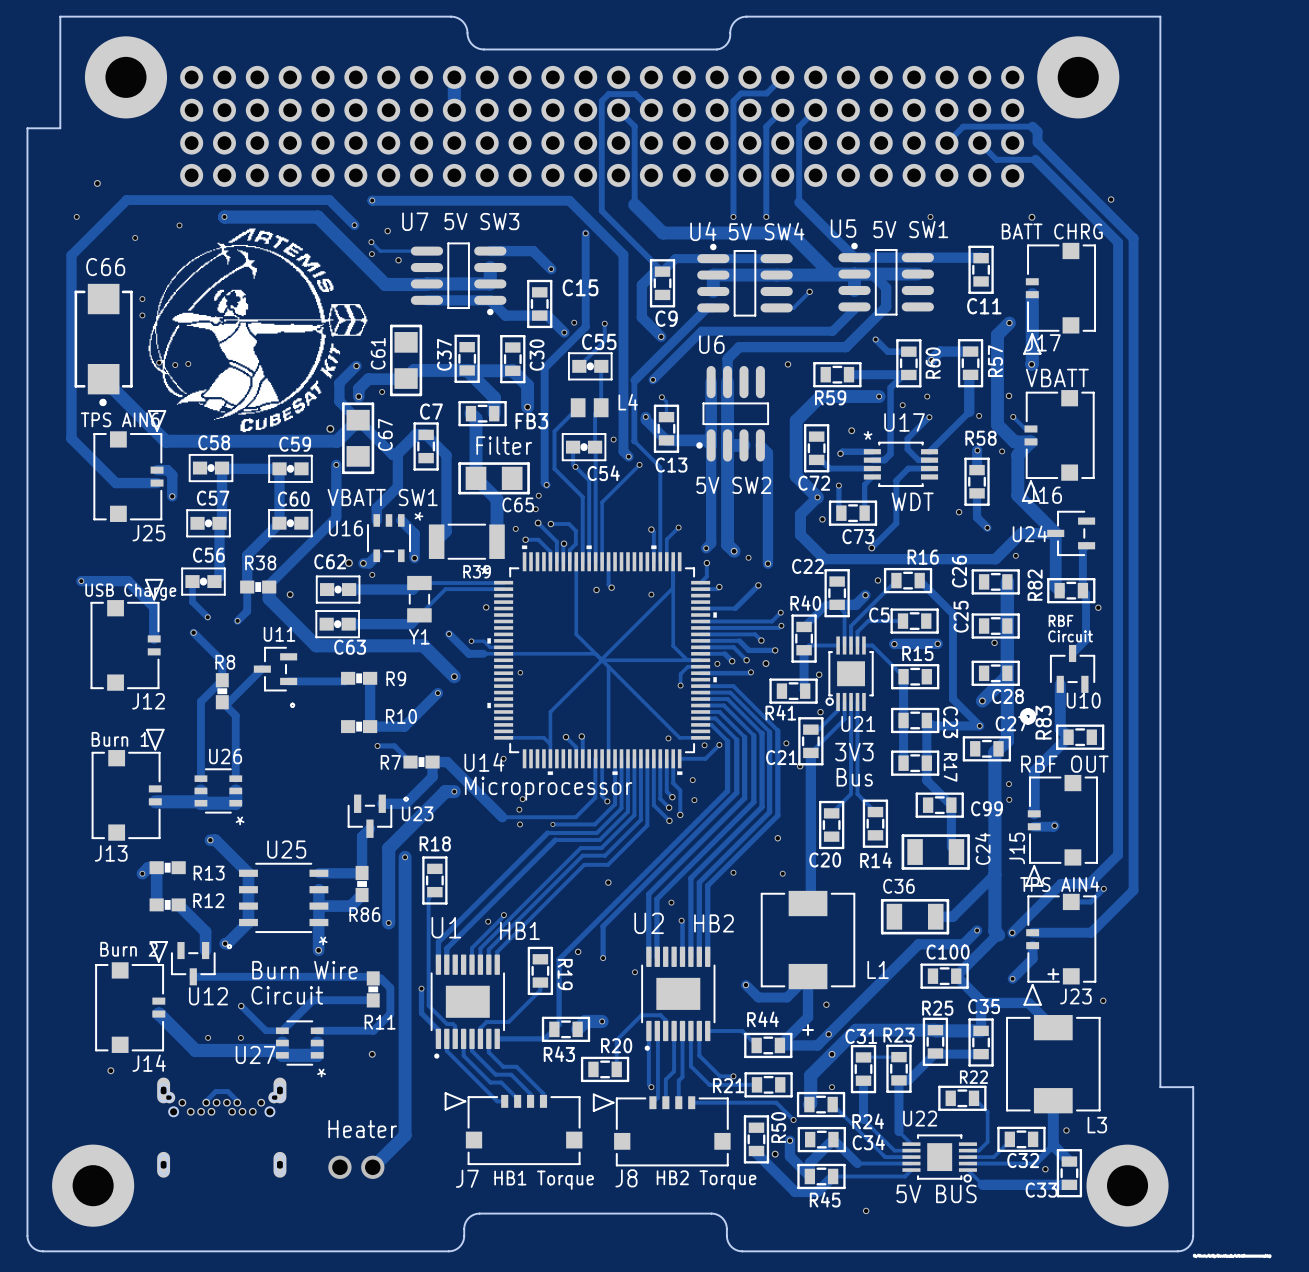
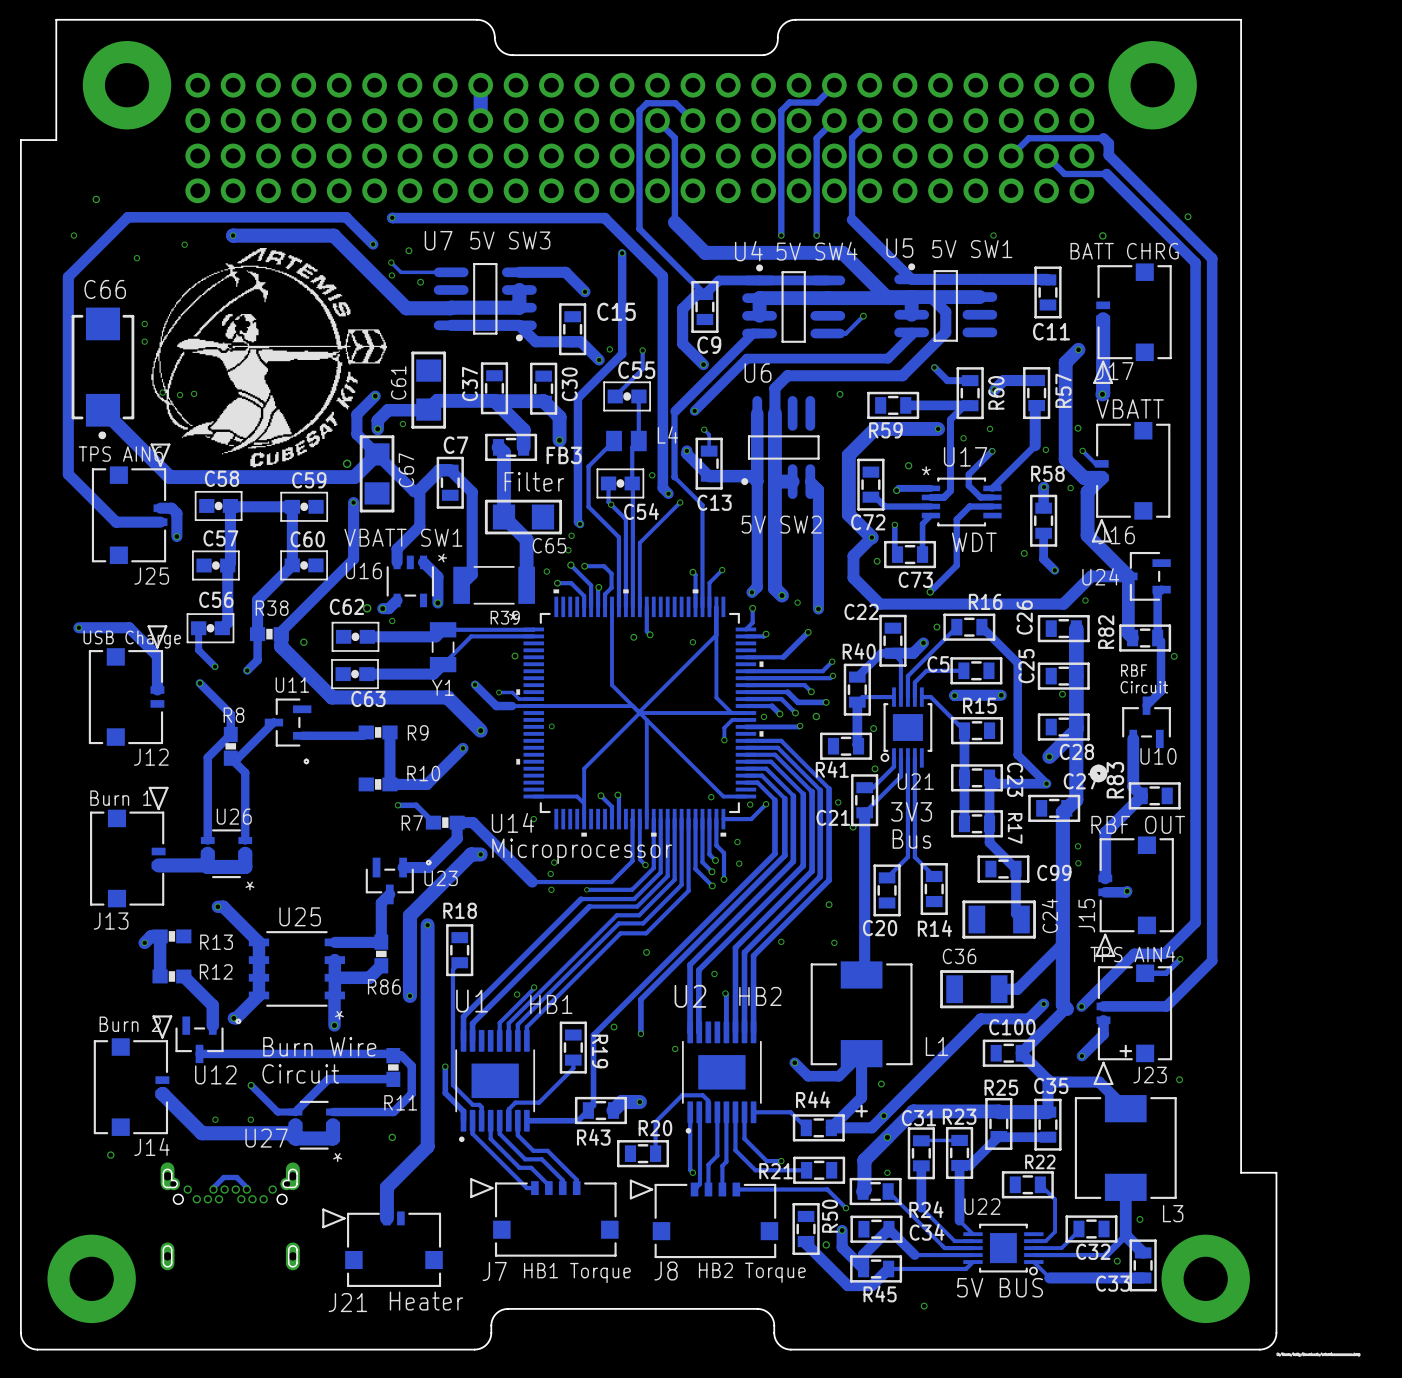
track: (405, 1062) (405, 1135) (372, 1167) -> (427, 1146) (386, 1187) (386, 1218)
text position: Heater (362, 1129) -> Heater (426, 1301)
J21: none -> (382, 1247)
via: (339, 1167) -> none
via: (372, 1167) -> none

